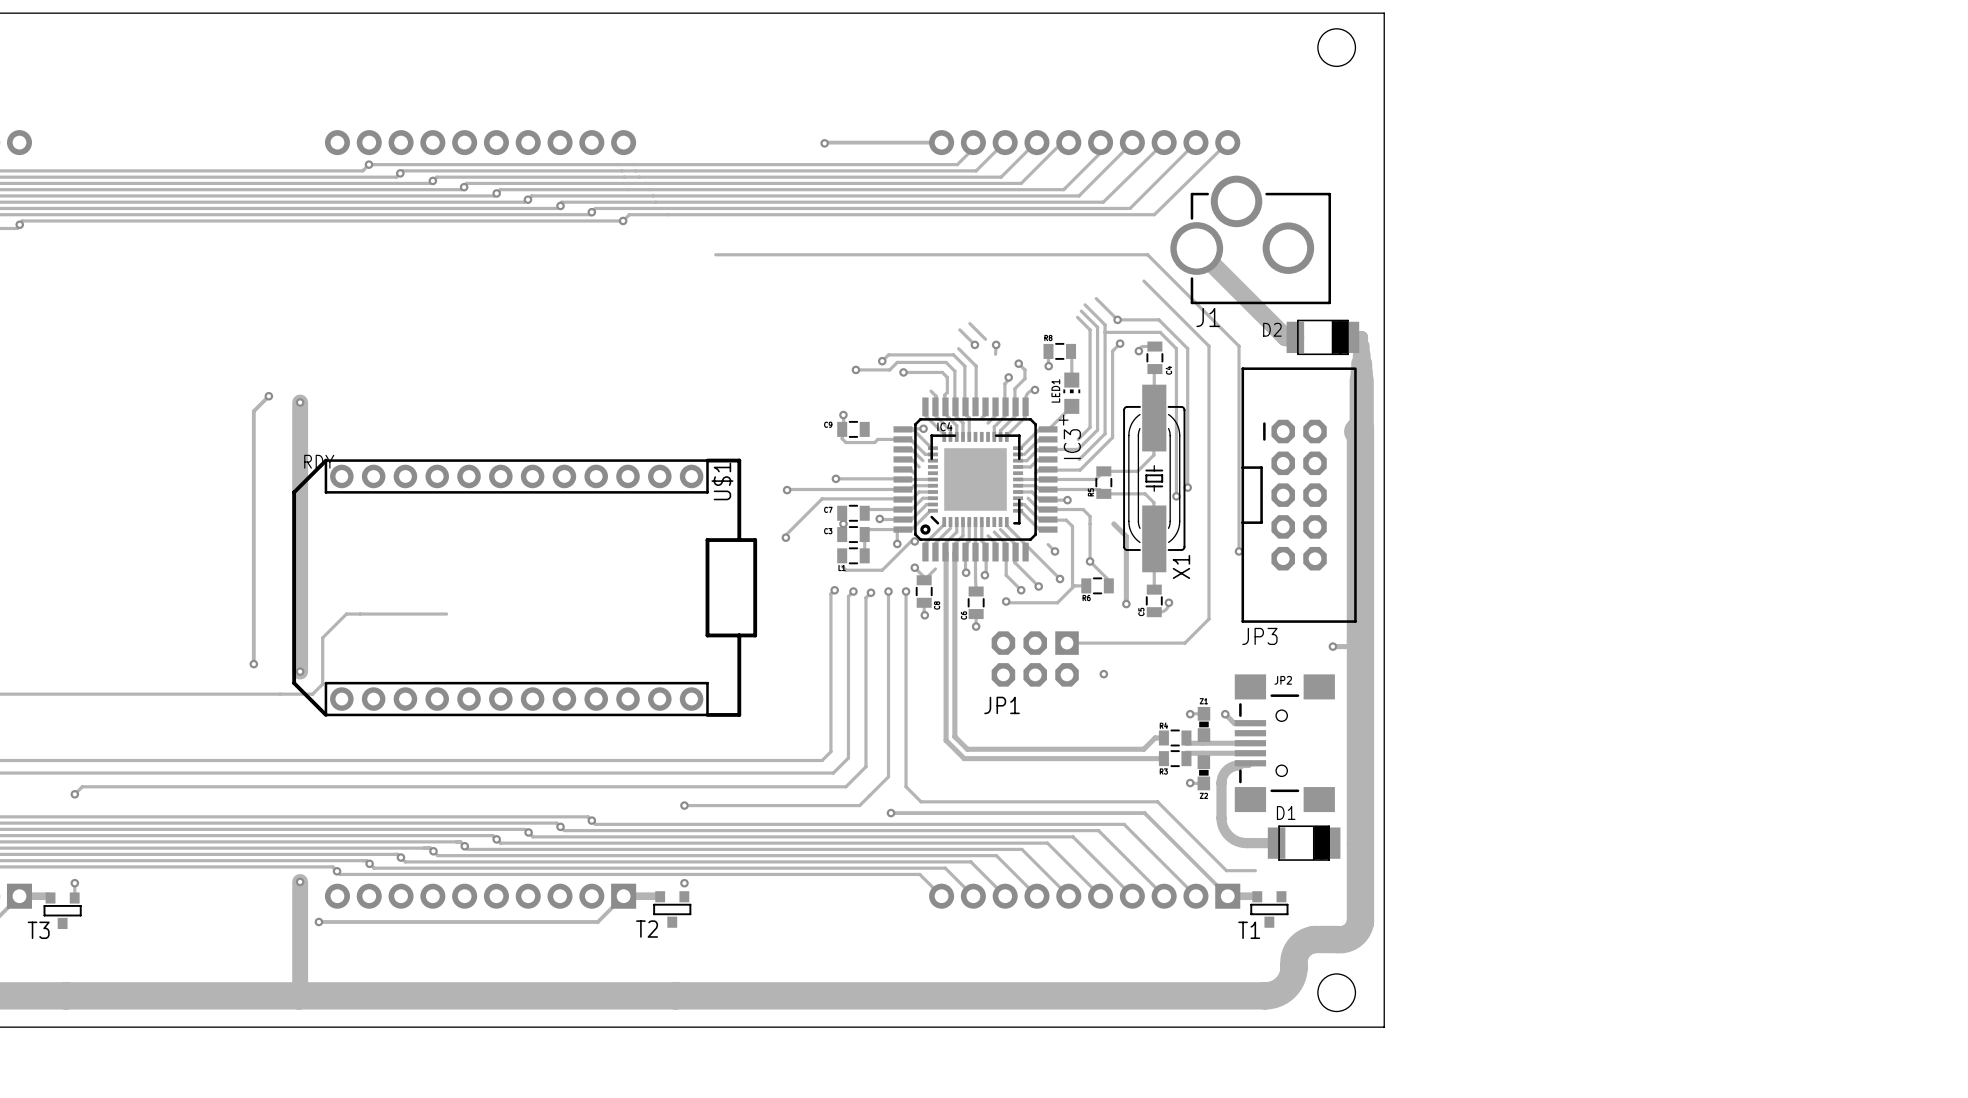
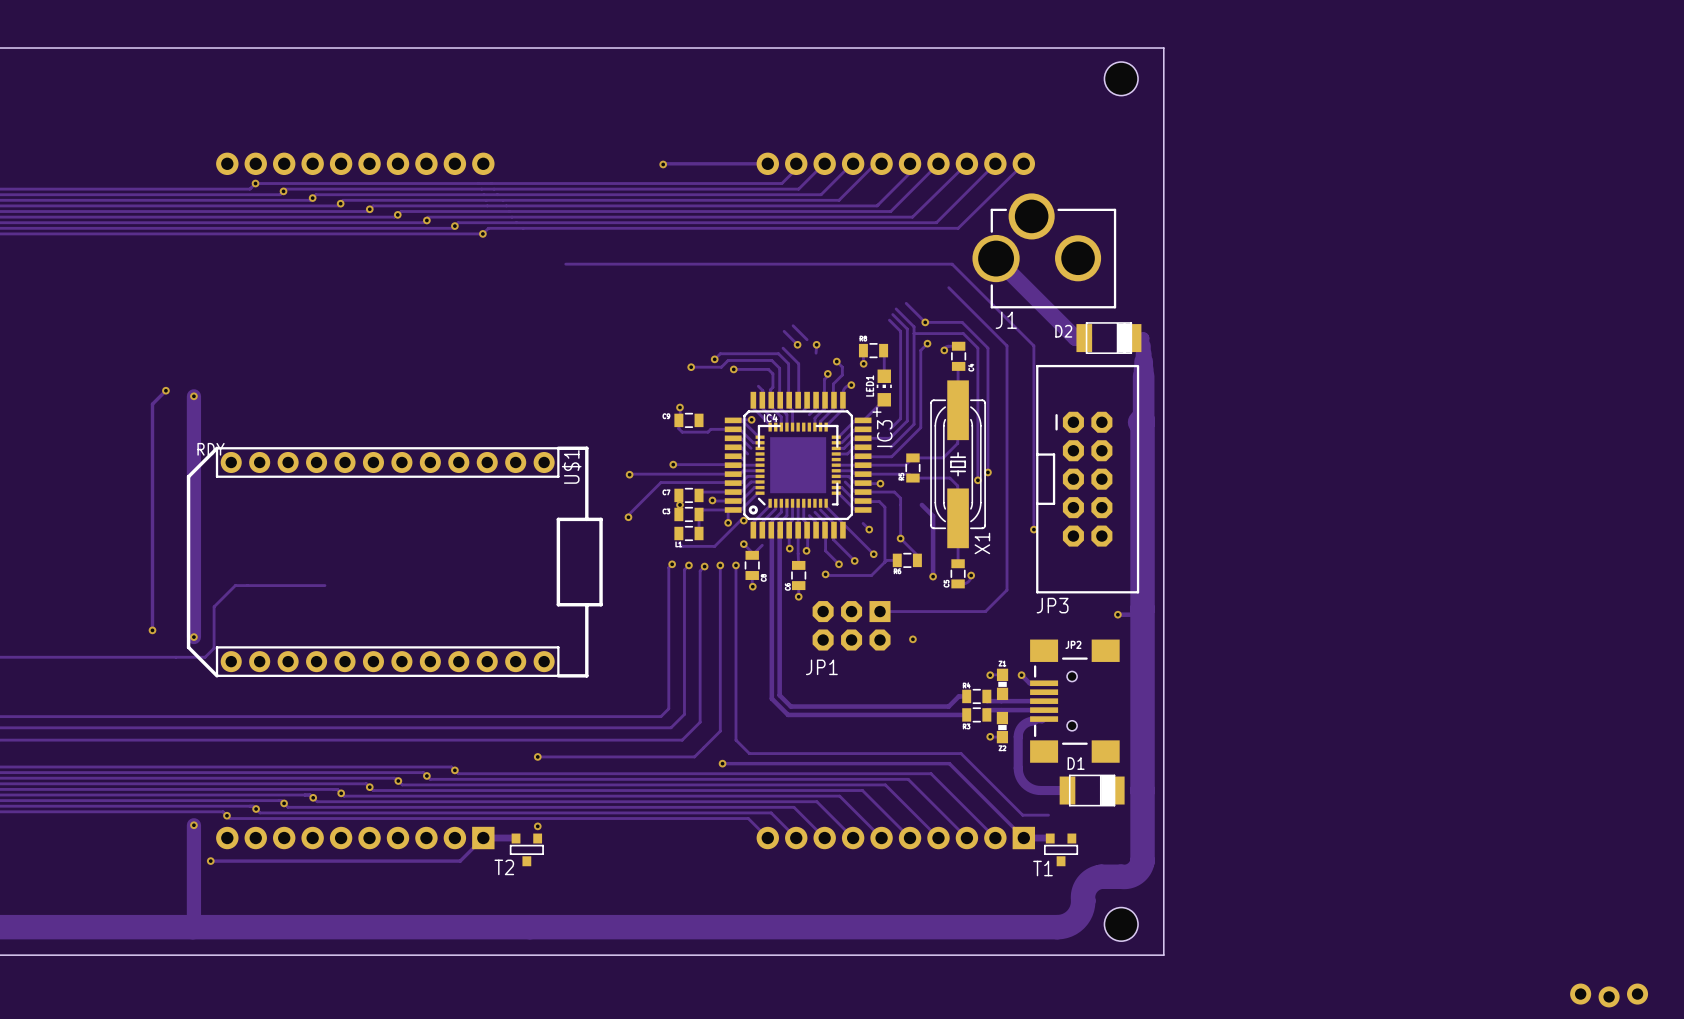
part: none -> (1609, 995)

